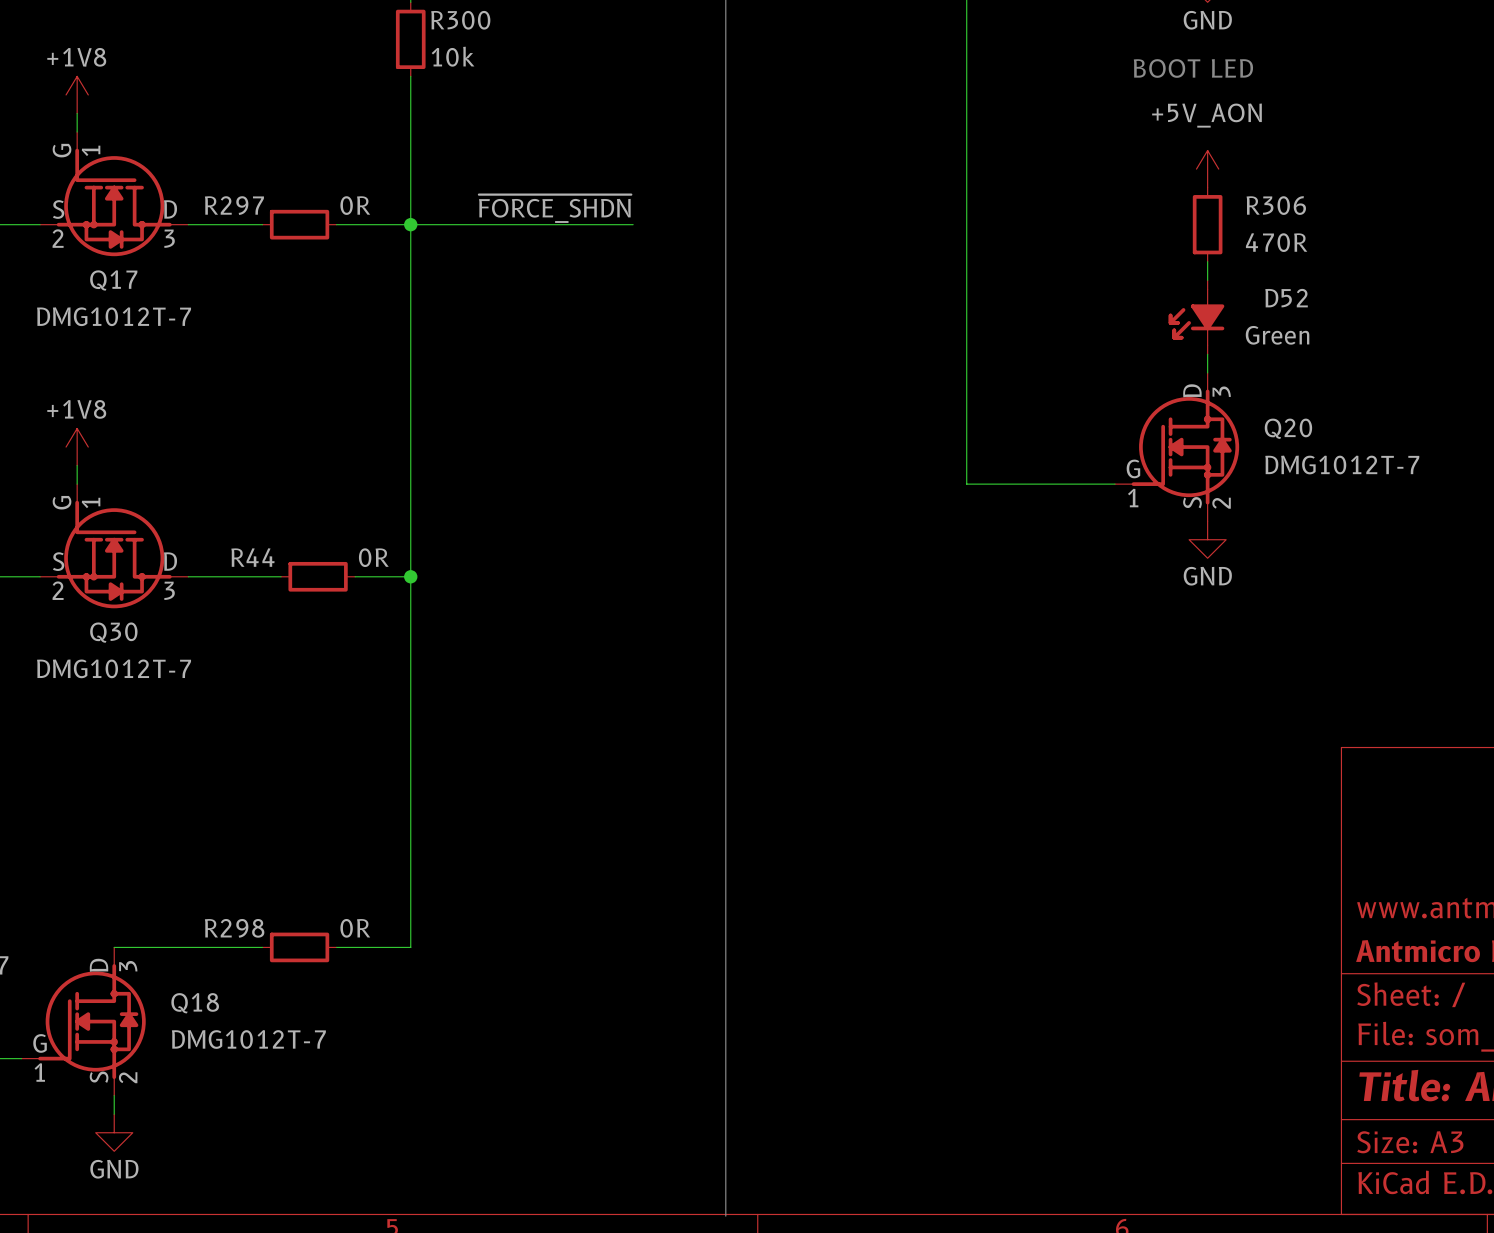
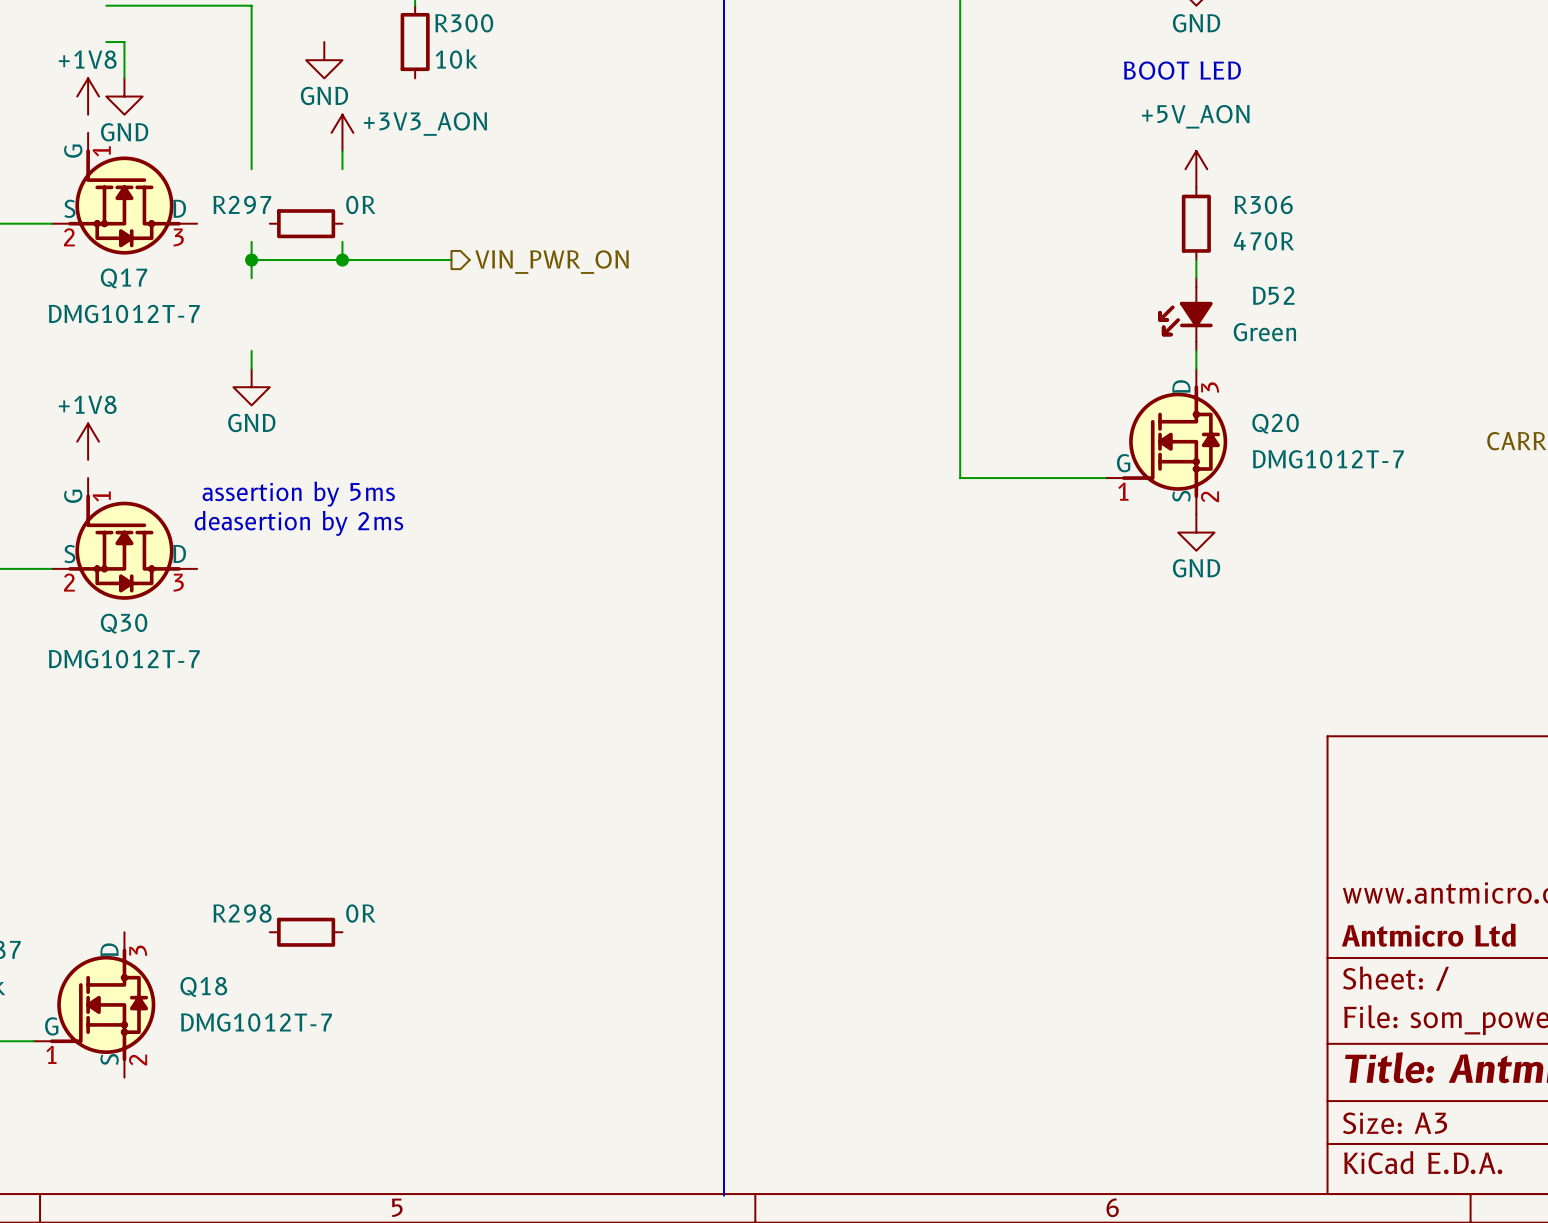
wire: none -> (106, 5) (251, 5) (251, 169)
wire: none -> (106, 42) (124, 42) (124, 78)
power symbol: none -> GND (324, 60)
wire: (410, 76) (410, 947) (336, 947) -> none
power symbol: none -> GND (124, 96)
wire: (77, 113) (77, 132) -> (342, 151) (342, 169)
power symbol: none -> +3V3_AON (342, 132)
label: ~{FORCE_SHDN} (555, 208) -> none
wire: (188, 224) (262, 224) -> none
wire: (336, 224) (633, 224) -> none
junction position: (410, 224) -> (342, 260)
wire: none -> (251, 241) (251, 278)
wire: none -> (342, 241) (342, 260)
wire: none -> (251, 260) (451, 260)
junction: none -> (251, 260)
hierarchical label: none -> VIN_PWR_ON (552, 262)
power symbol: none -> GND (251, 387)
wire: (77, 465) (77, 484) -> (251, 350) (251, 369)
text: none -> assertion by 5ms (298, 494)
text: none -> deasertion by 2ms (298, 523)
wire: (188, 576) (281, 576) -> none
R44: (318, 576) -> none
wire: (355, 576) (410, 576) -> none
junction: (410, 576) -> none
wire: (114, 947) (262, 947) -> none
wire: (114, 1095) (114, 1114) -> none
power symbol: GND (114, 1132) -> none

